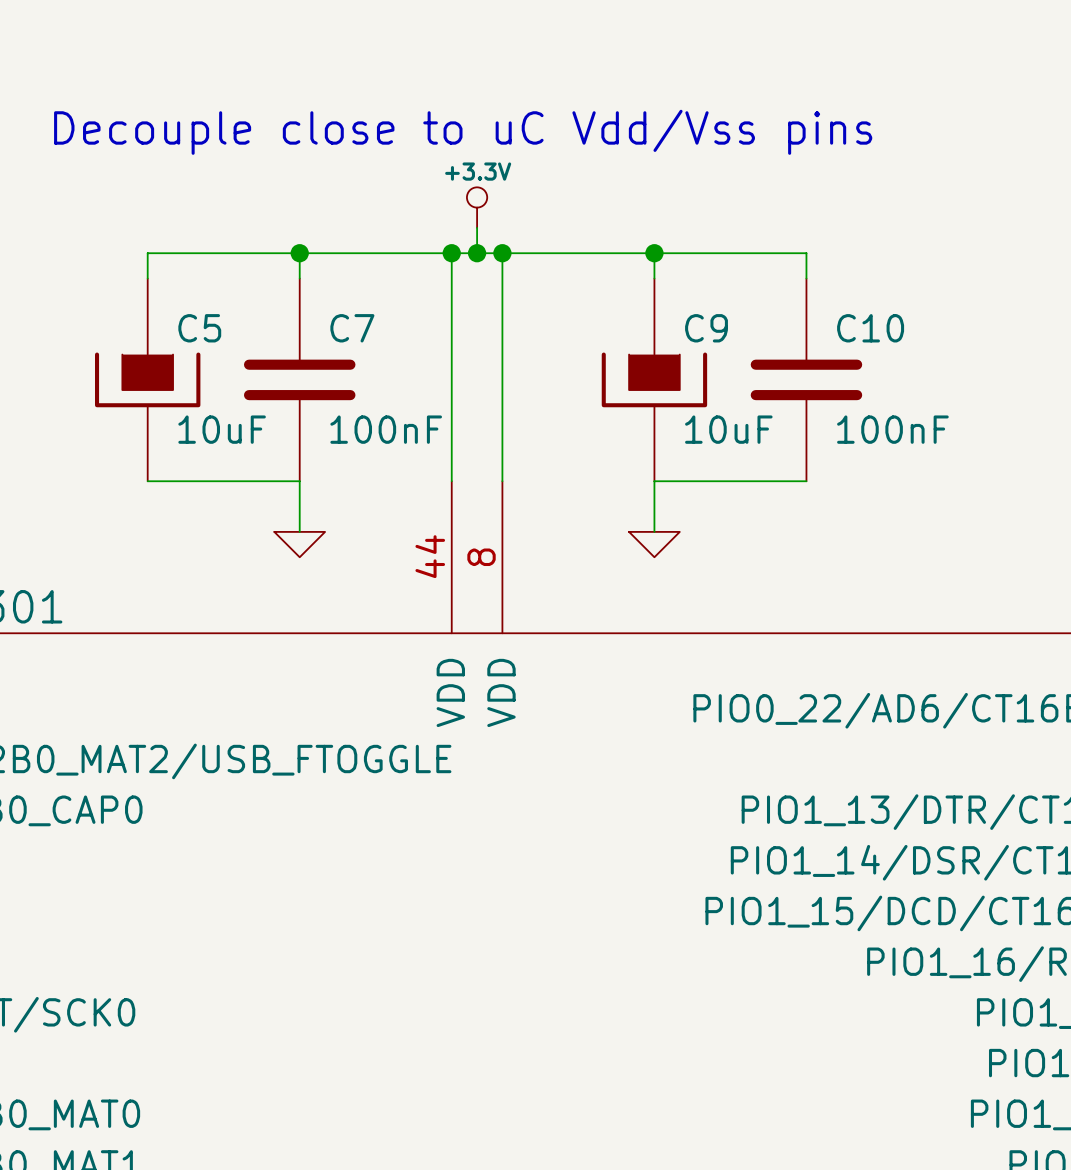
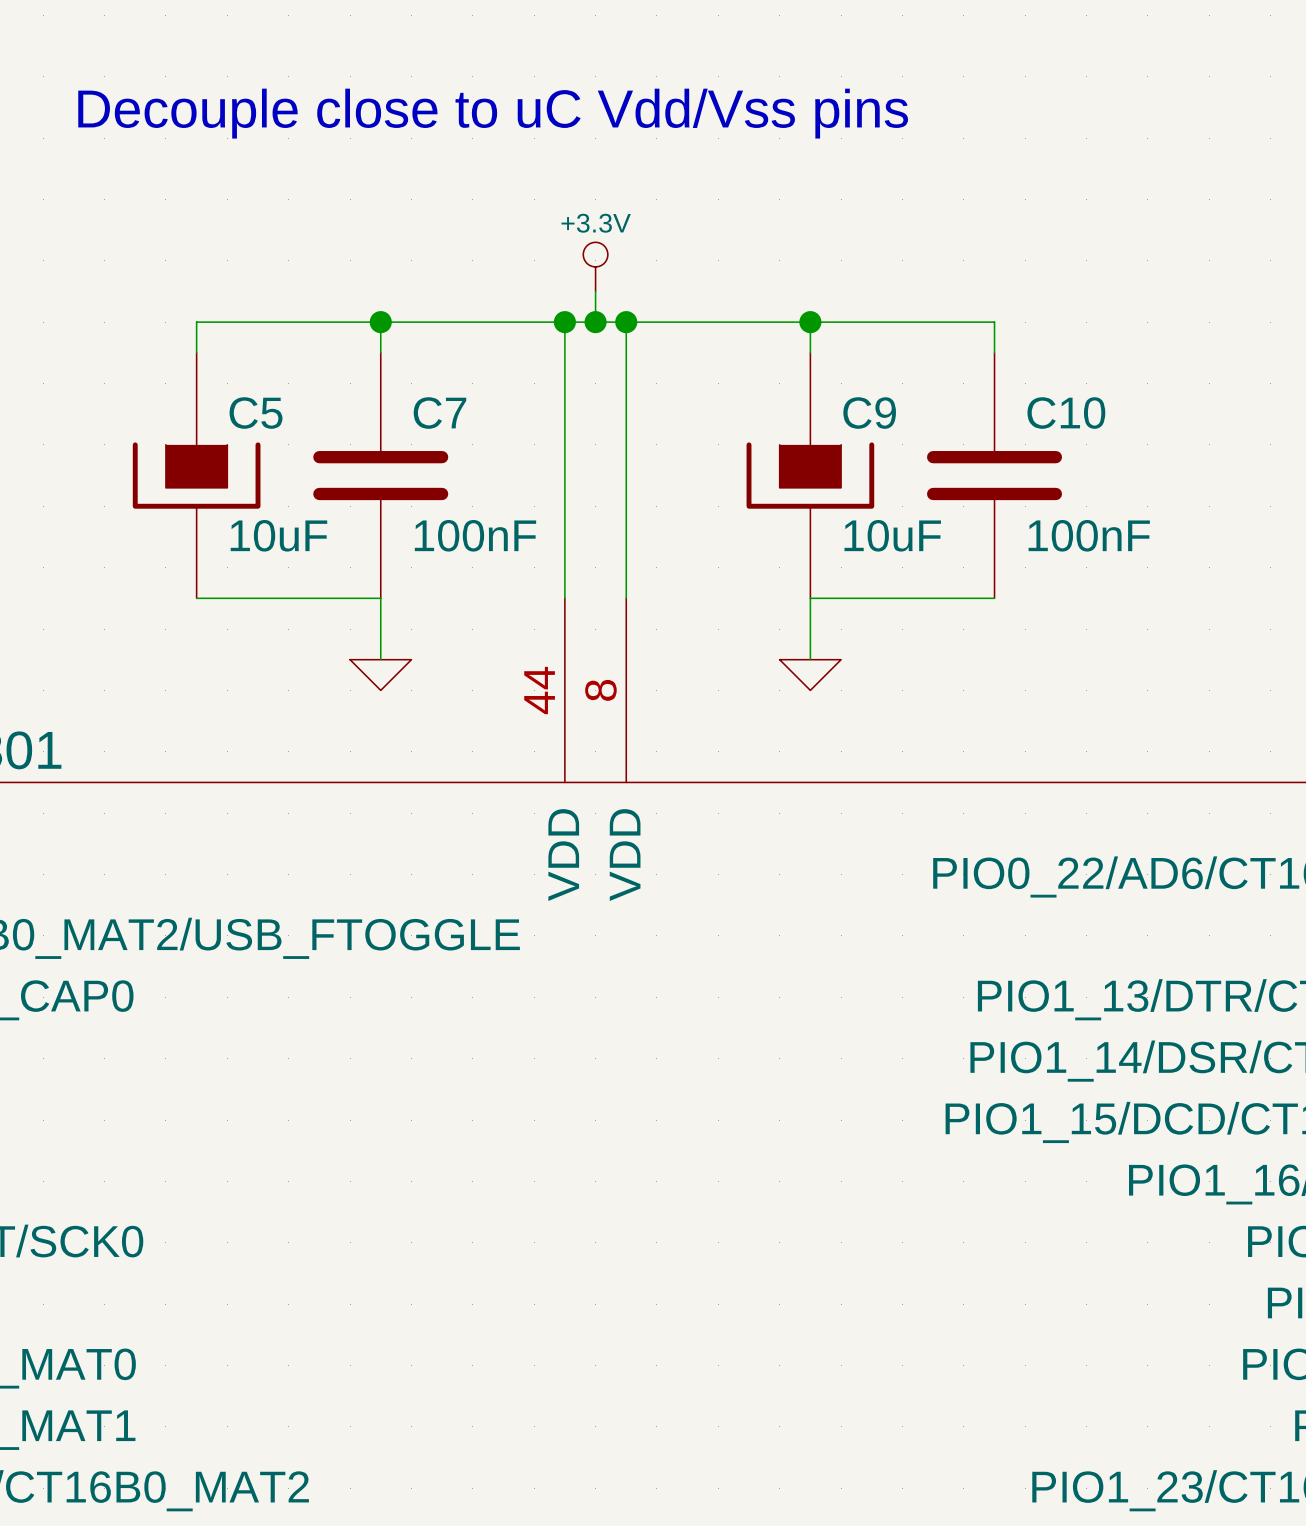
text position: Decouple close to uC Vdd/Vss pins (463, 132) -> Decouple close to uC Vdd/Vss pins (493, 113)

